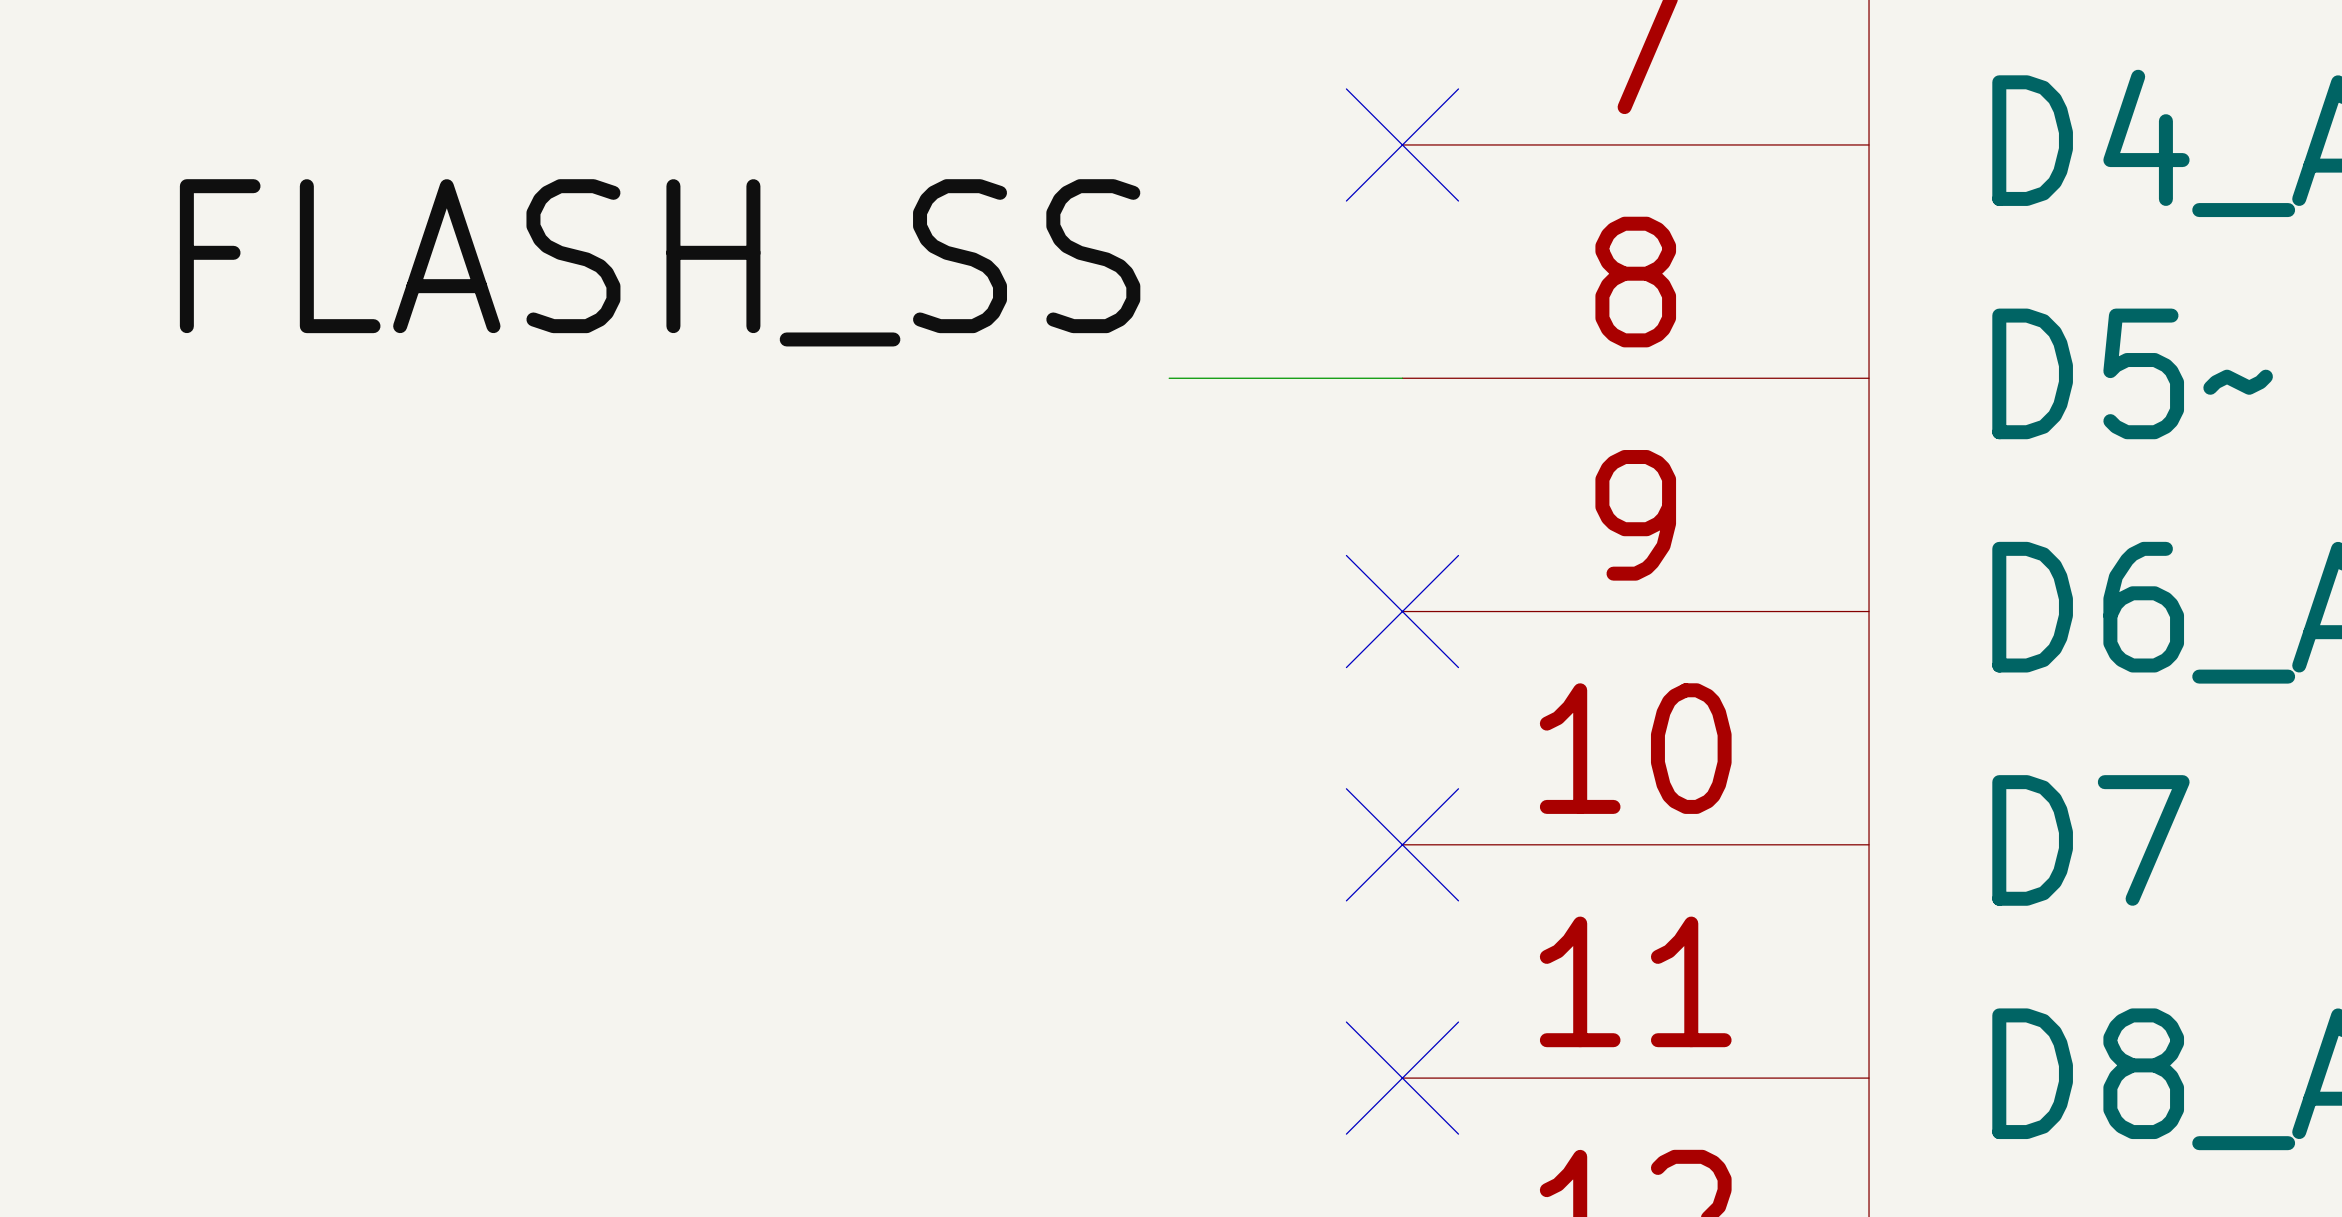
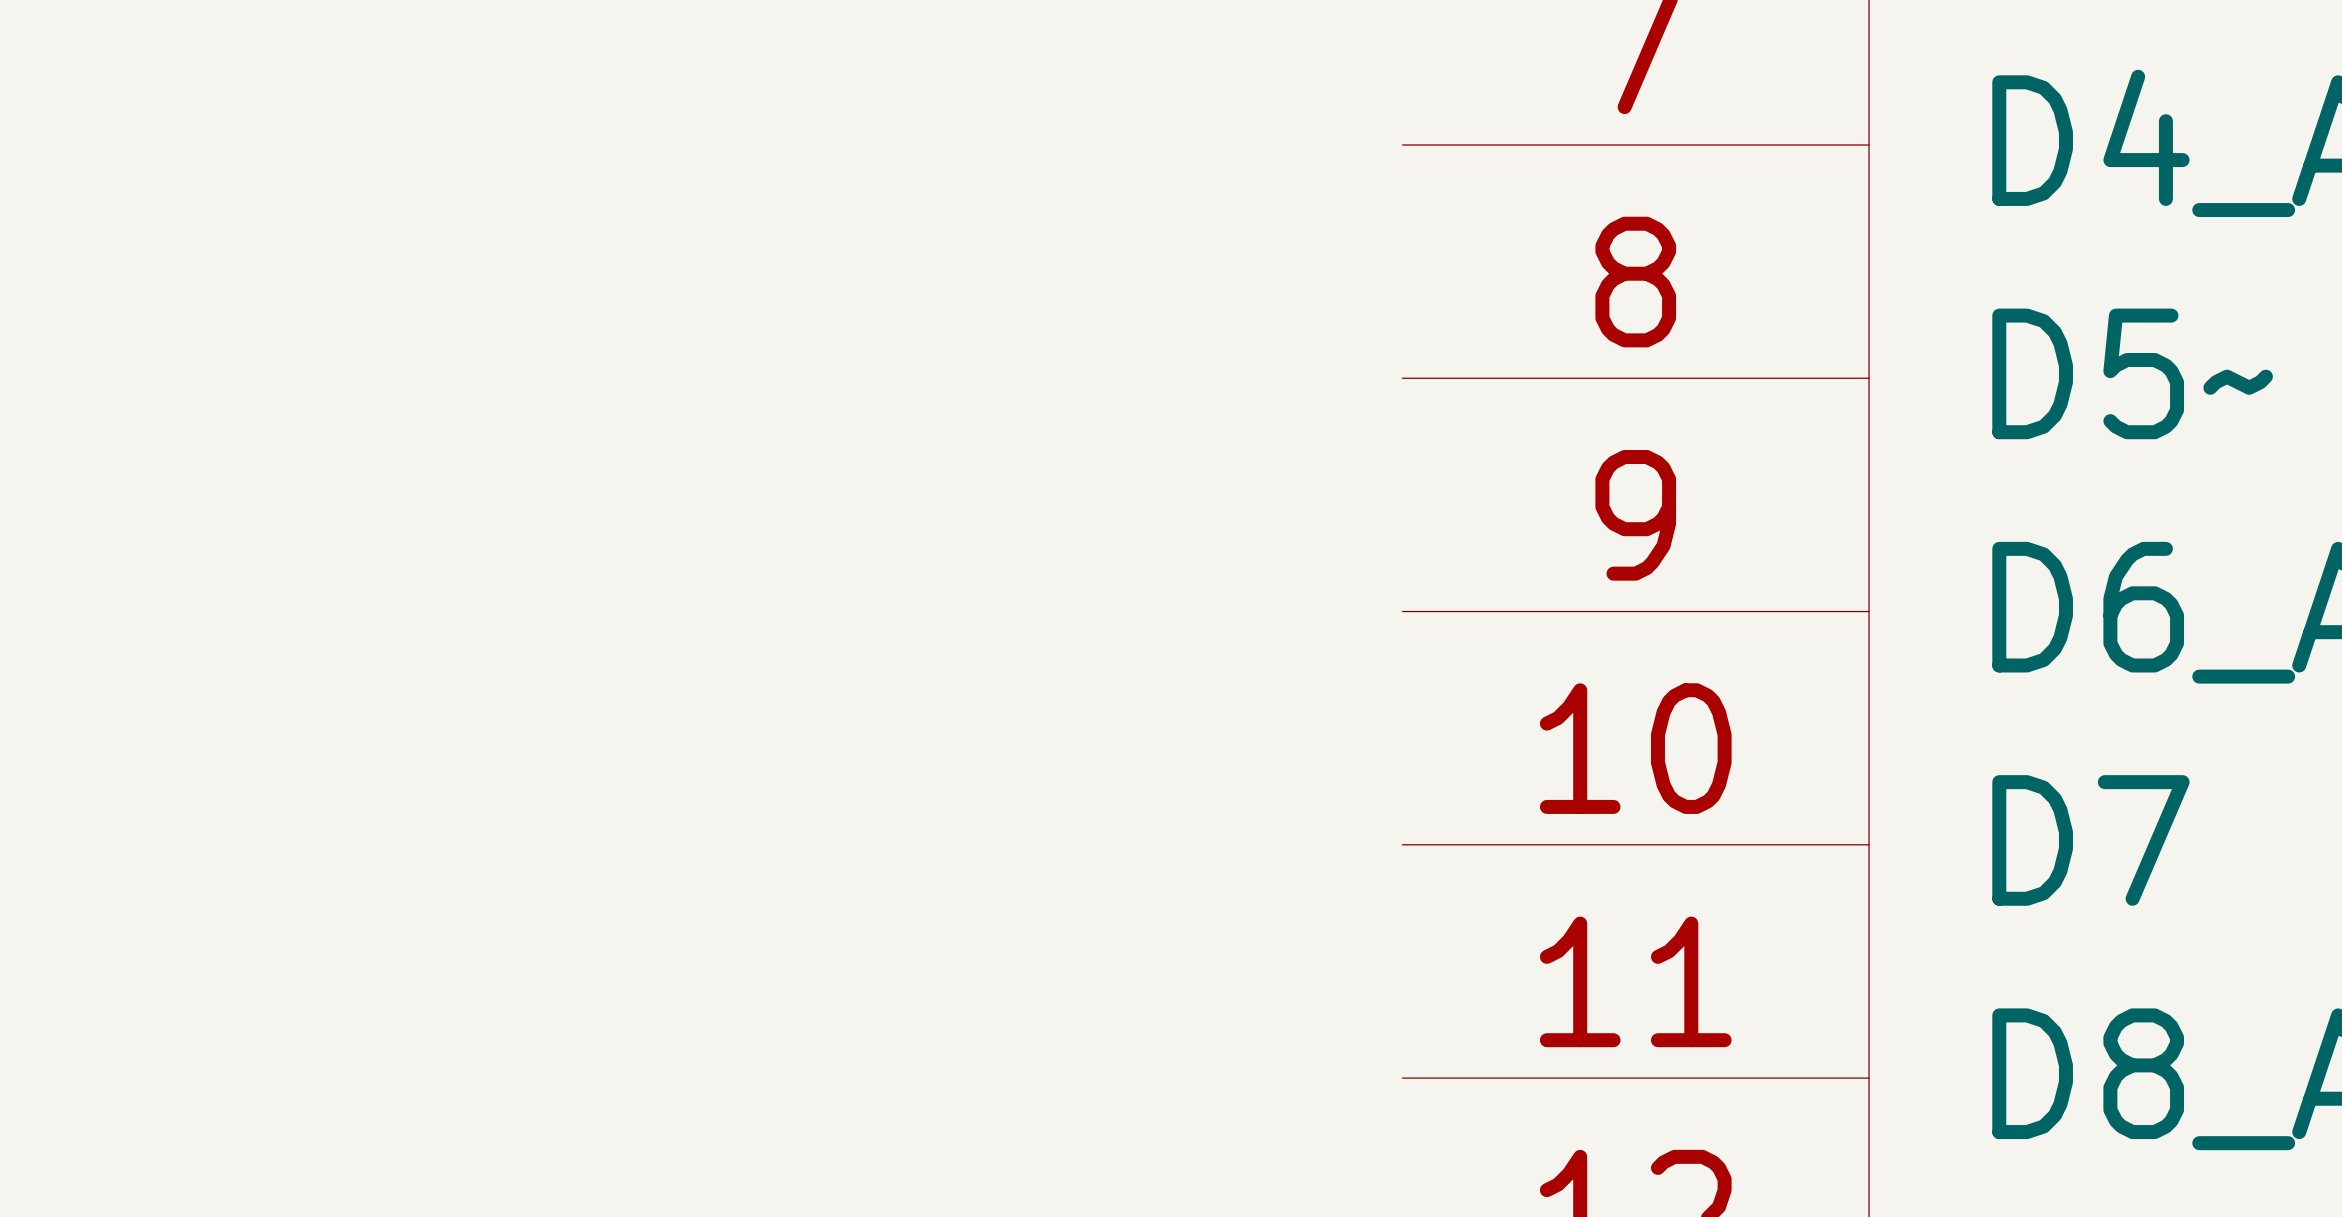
no-connect mark: (1402, 144) -> none
label: FLASH_SS (660, 262) -> none
wire: (1169, 378) (1402, 378) -> none
no-connect mark: (1402, 611) -> none
no-connect mark: (1402, 844) -> none
no-connect mark: (1402, 1078) -> none

